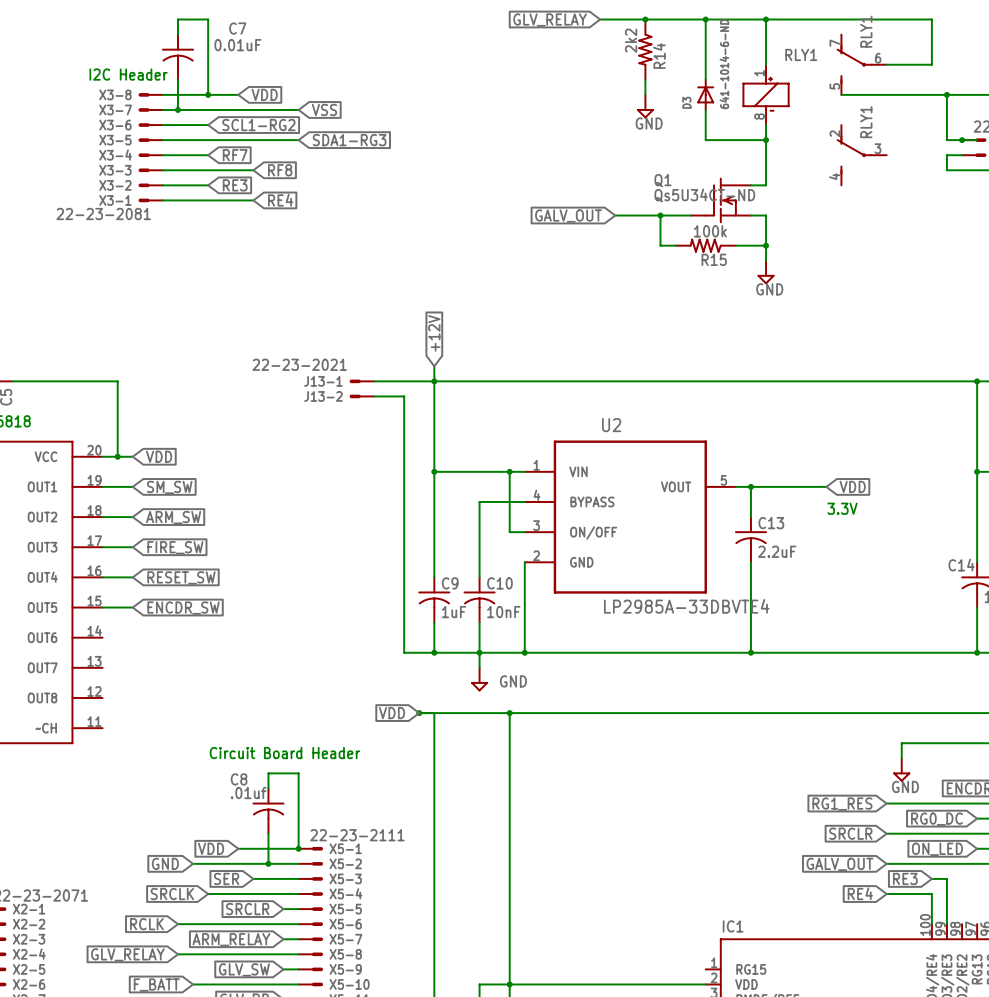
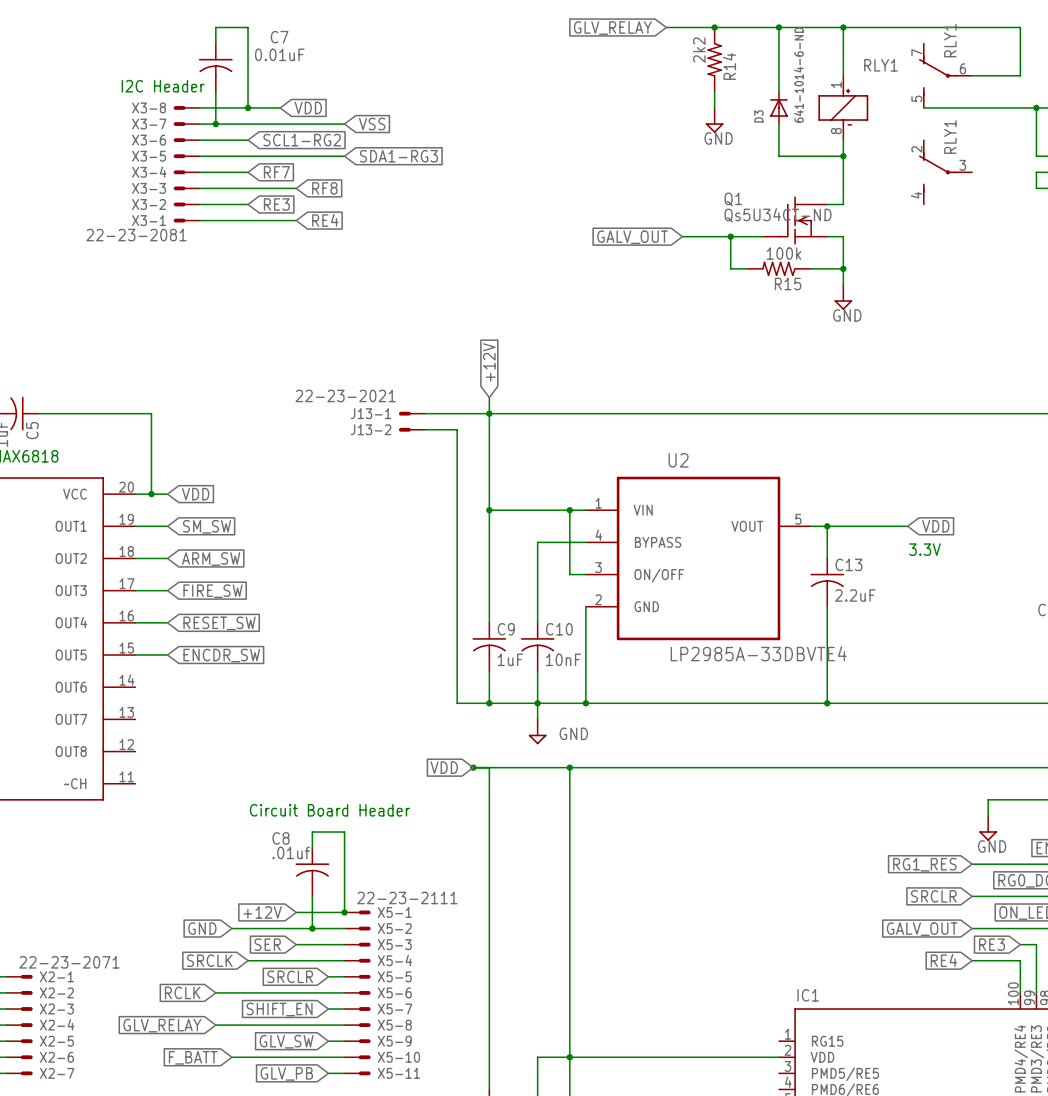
global label: VDD (211, 848) -> none
global label: none -> +12V (262, 912)
wire: (238, 848) (253, 848) -> none
global label: ARM_RELAY (231, 939) -> SHIFT_EN (279, 1009)

